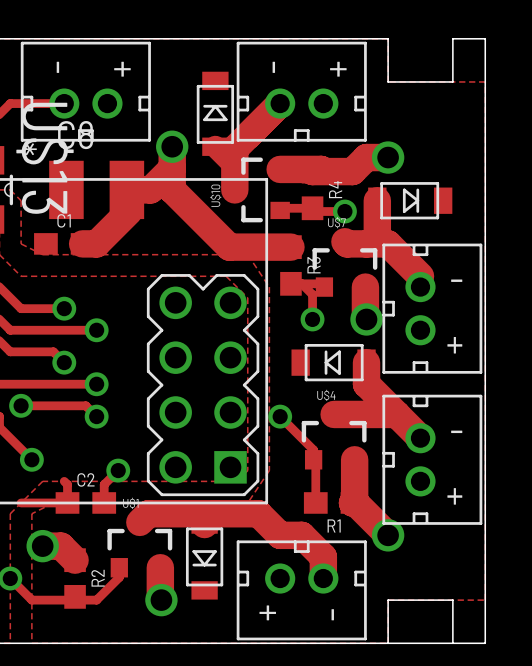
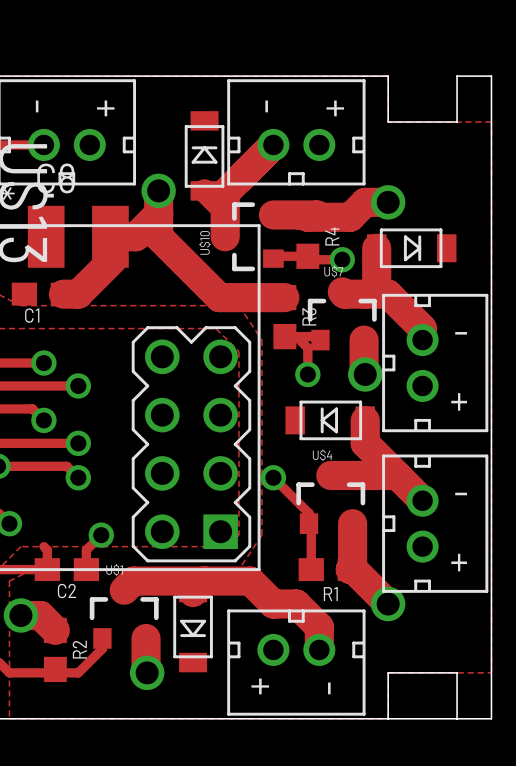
C1 name position: C1 (64, 220) -> C1 (32, 315)
C2 name position: C2 (85, 479) -> C2 (66, 591)

